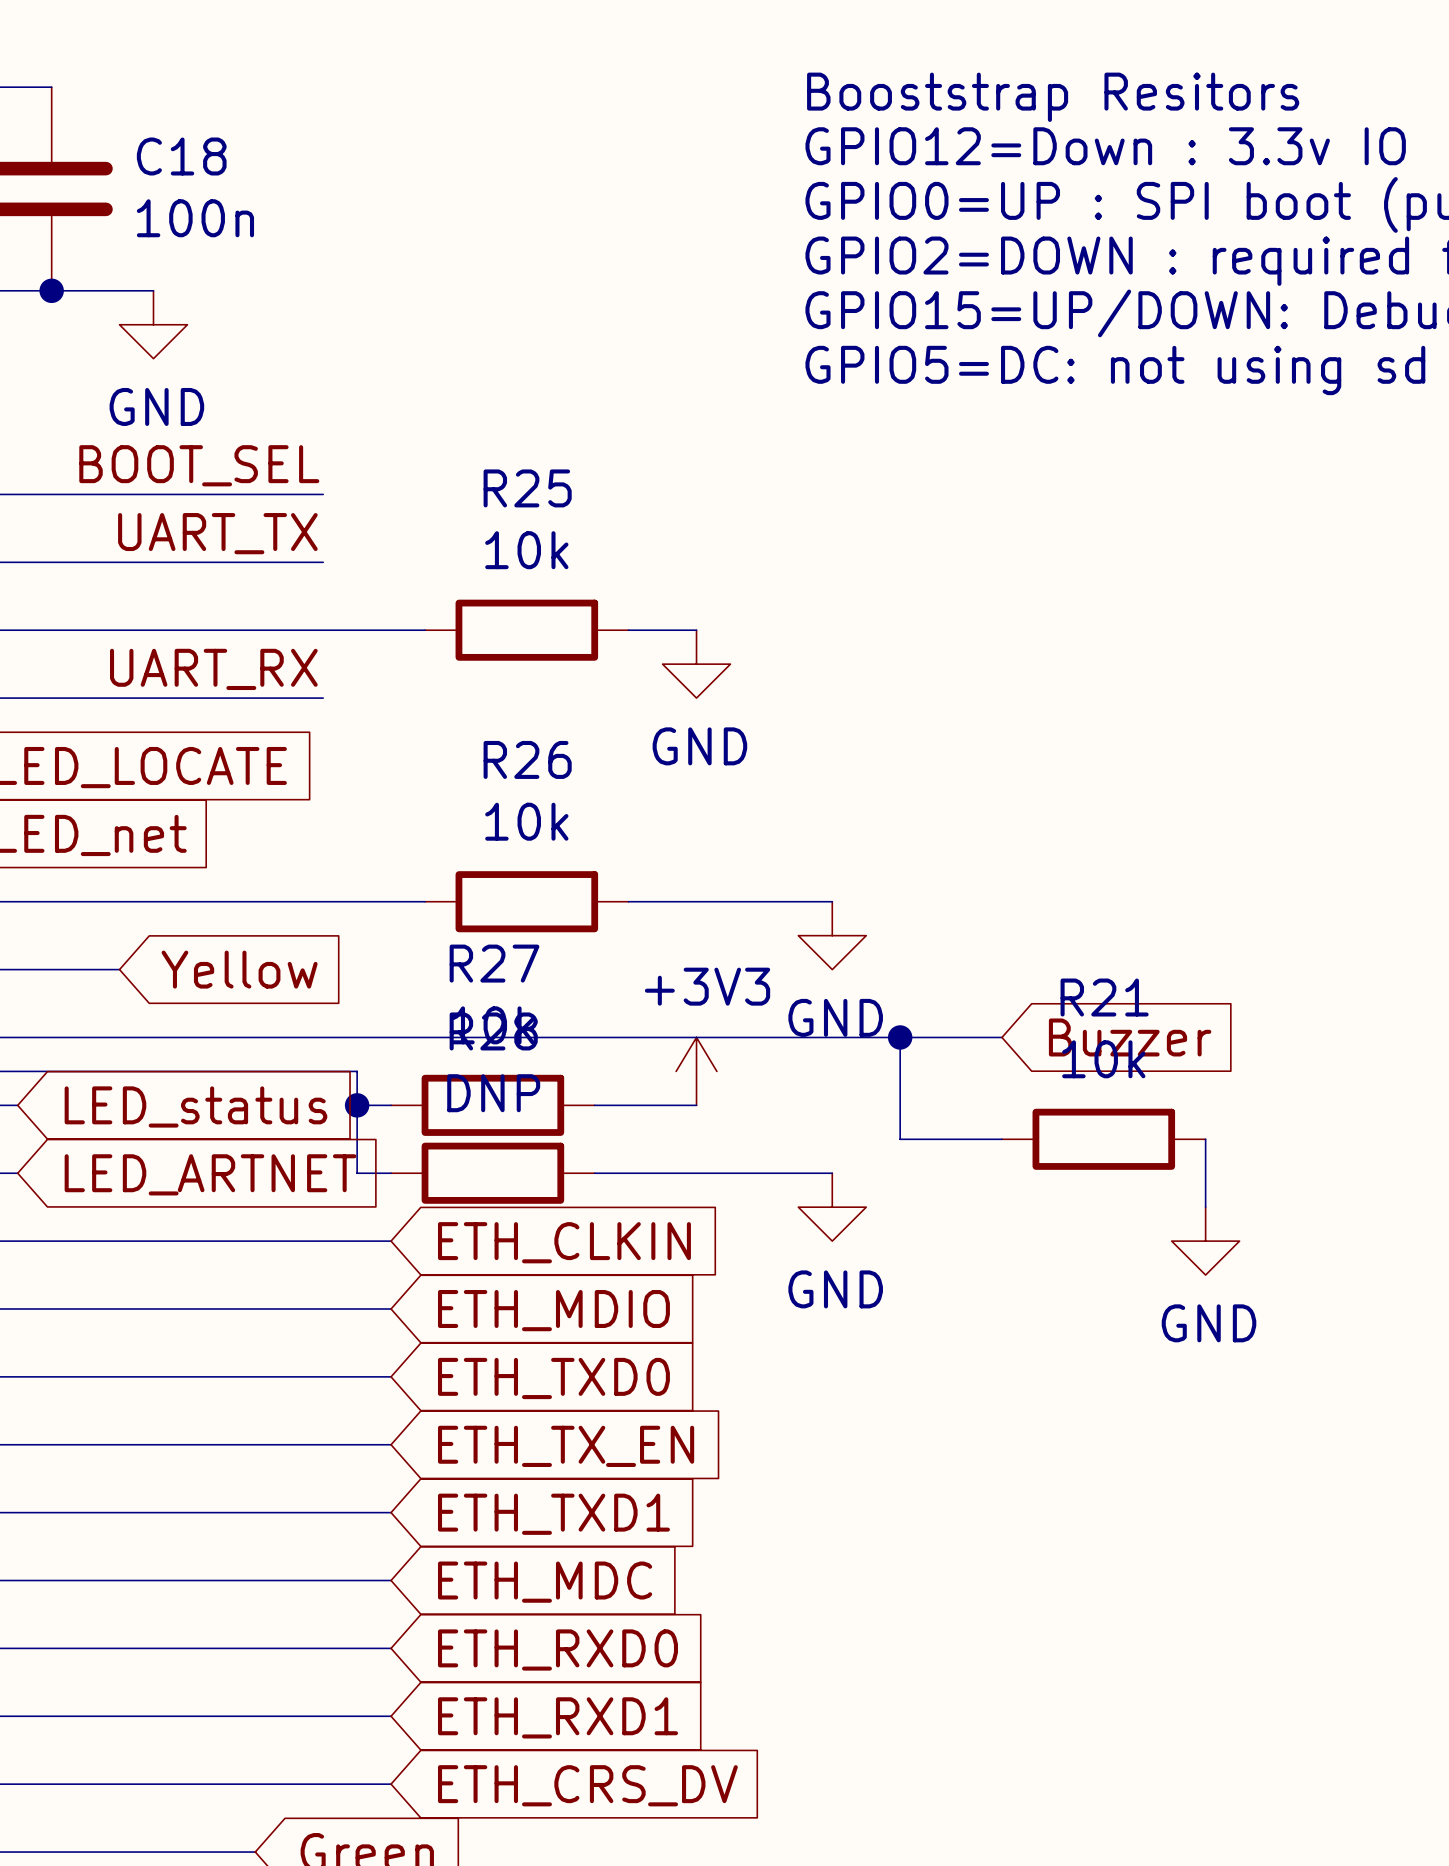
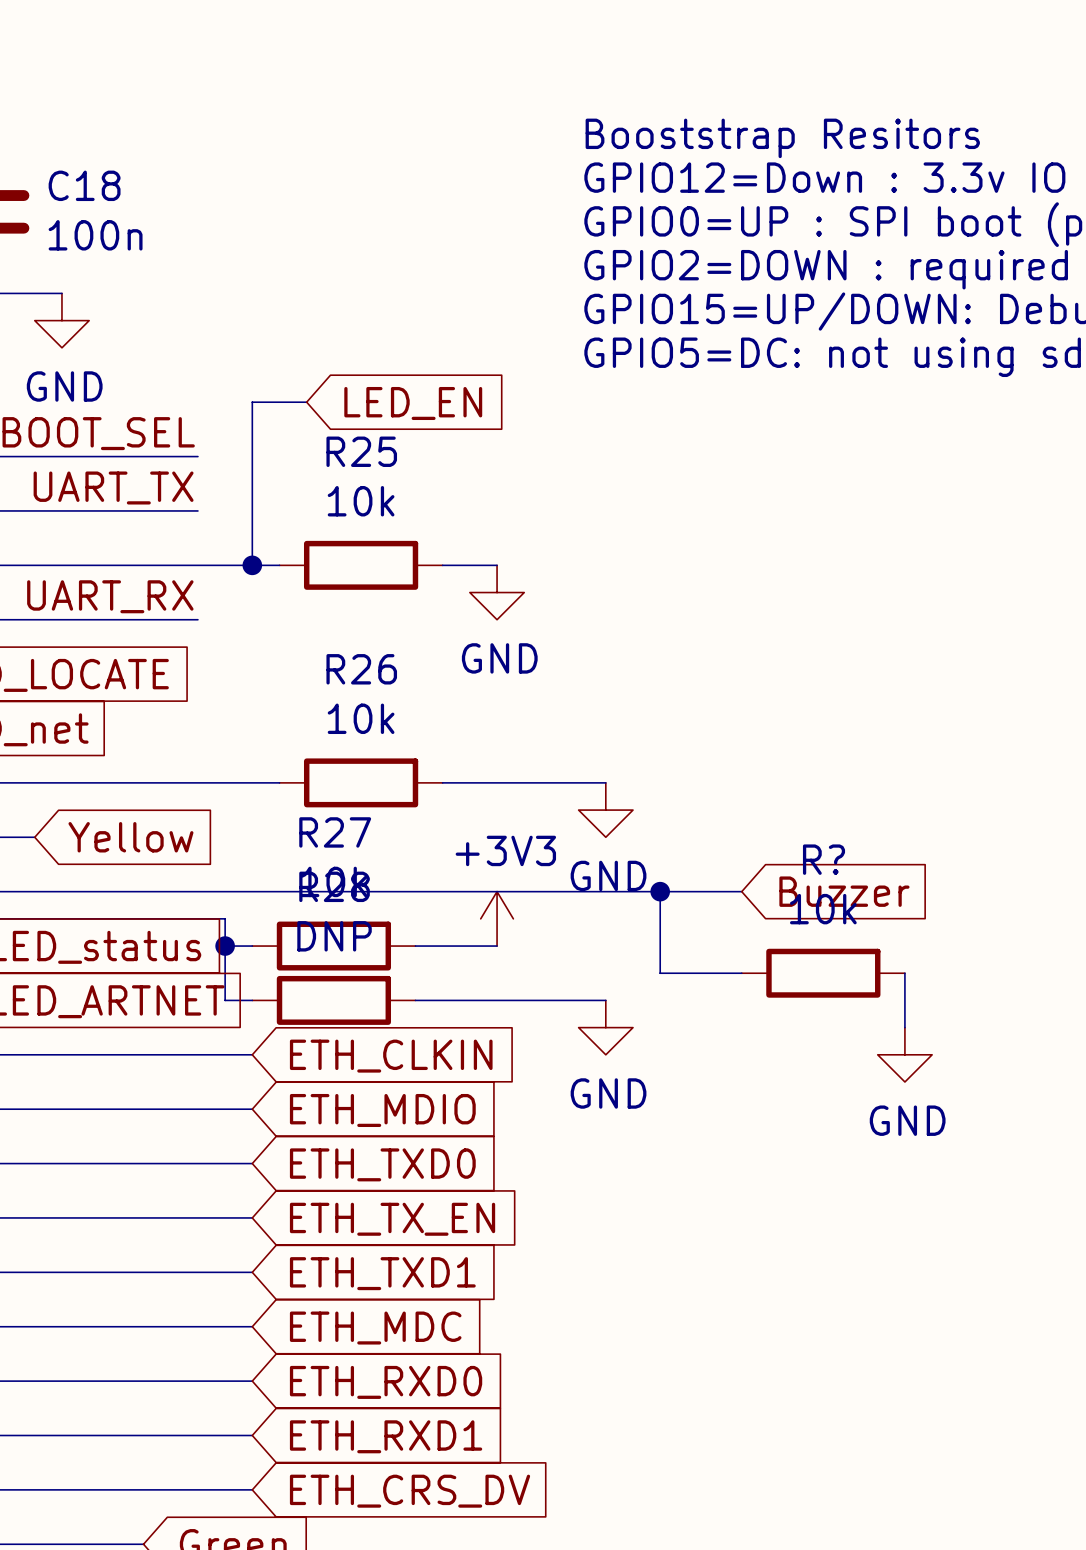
wire: none -> (306, 402) (252, 402) (252, 565)
global label: none -> LED_EN (413, 403)
junction: none -> (252, 565)
R21 name: R21 (1104, 997) -> R? (824, 859)

